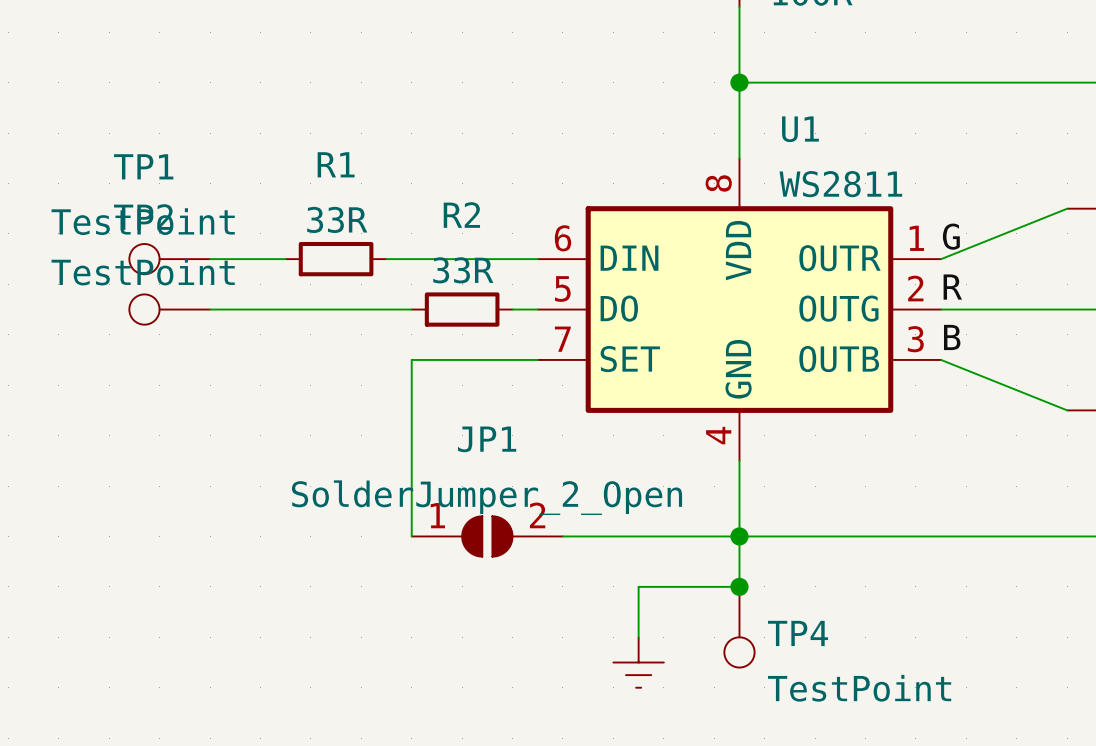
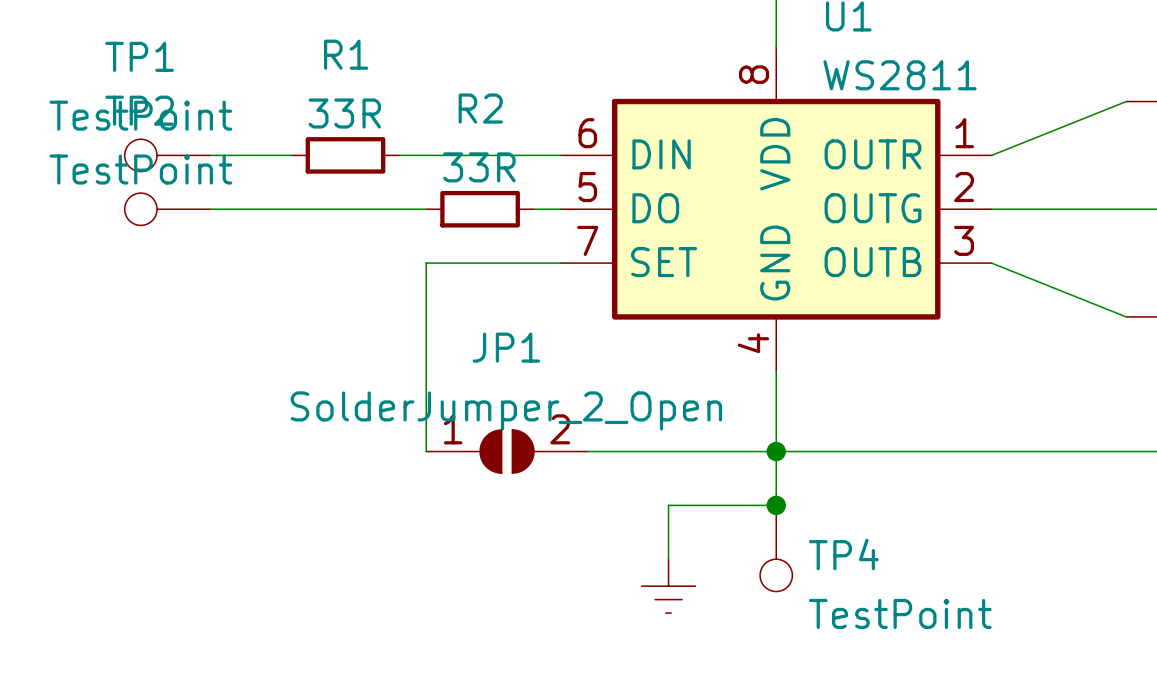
label: G (951, 236) -> none
label: R (952, 287) -> none
label: B (952, 337) -> none

